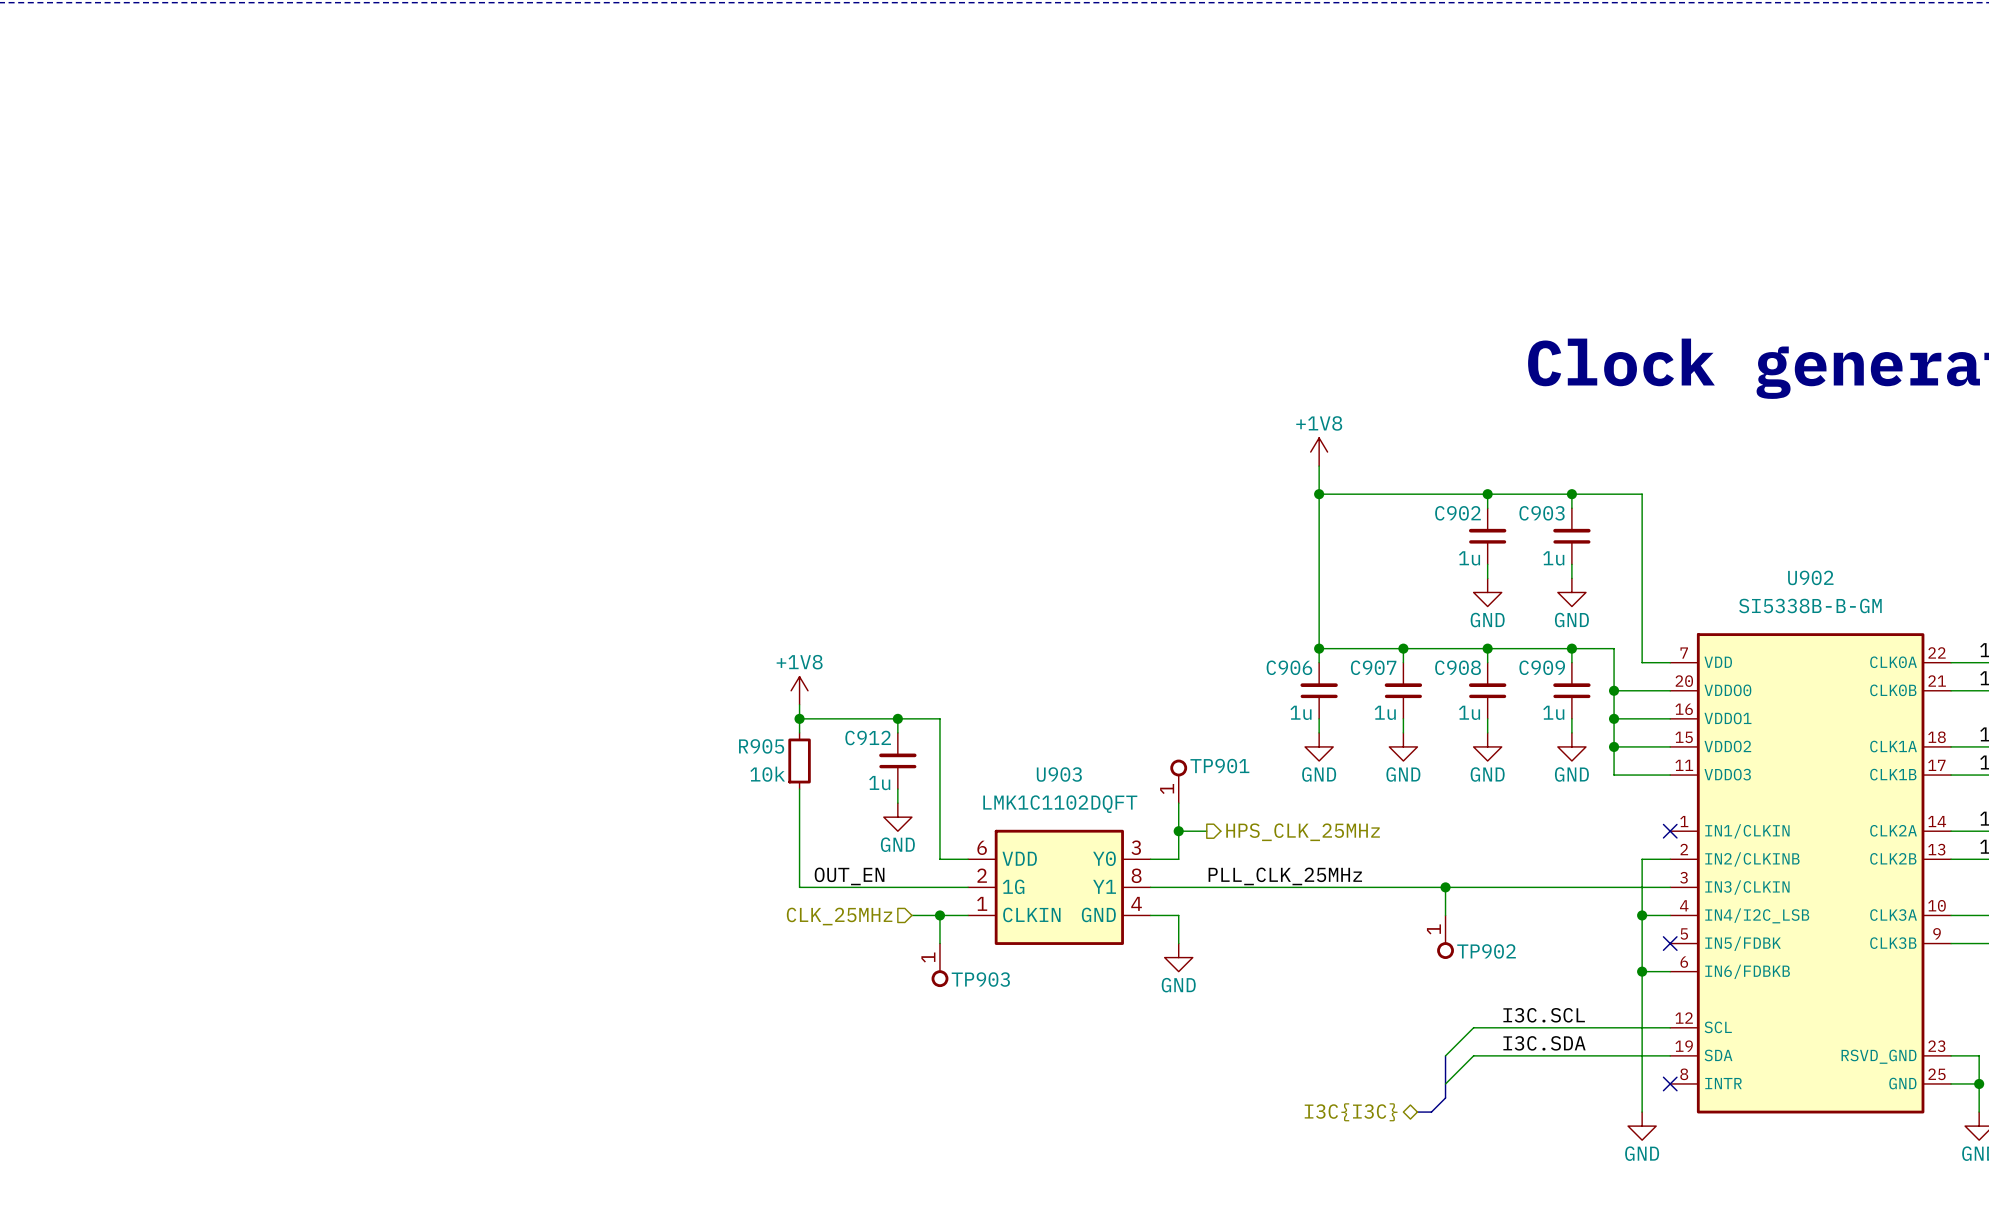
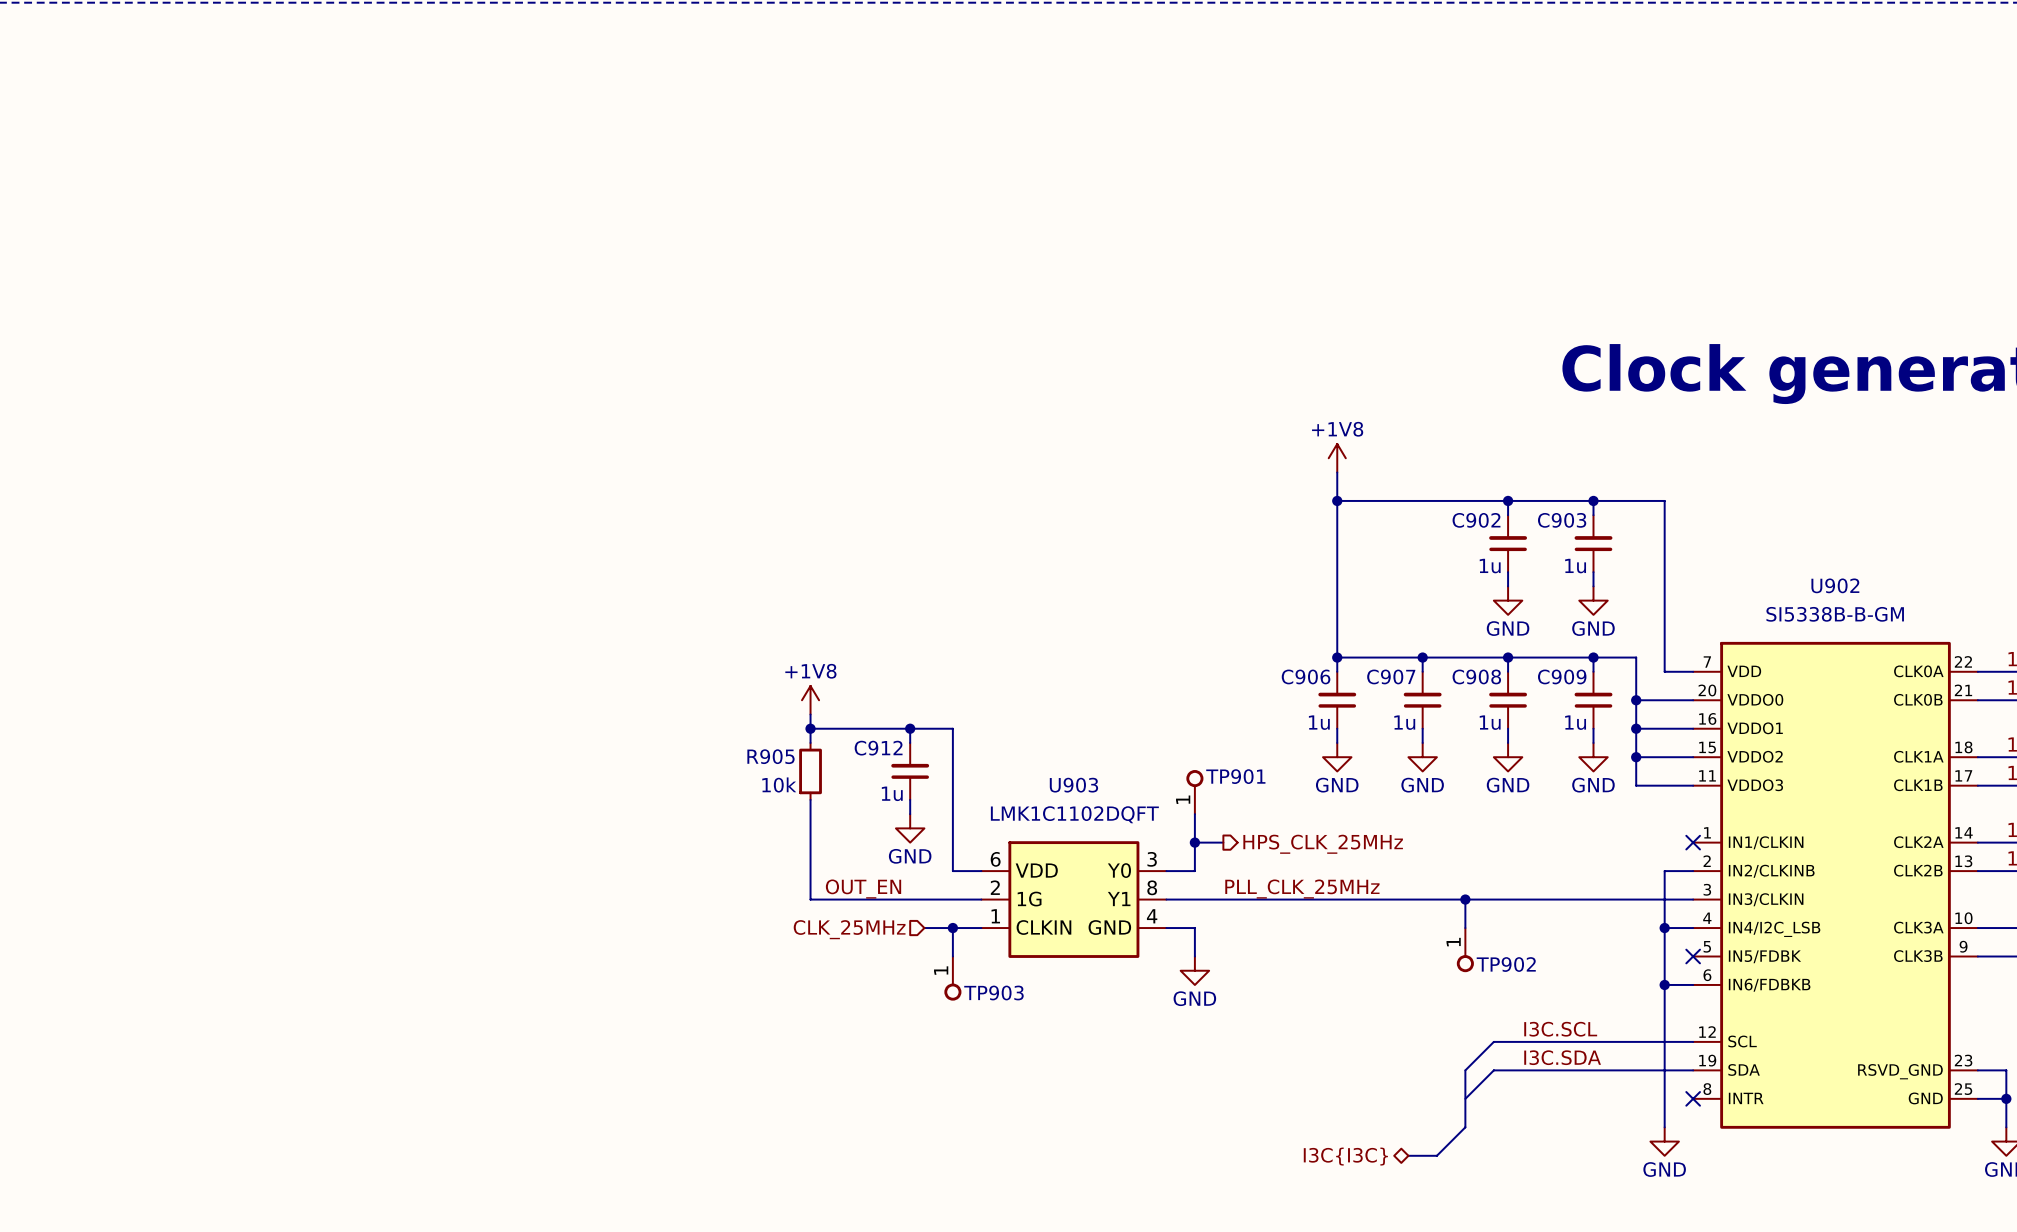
bus: (1445, 1098) (1431, 1112) (1417, 1112) -> (1465, 1113) (1465, 1127) (1436, 1155) (1408, 1155)
hierarchical label position: I3C{I3C} (1351, 1112) -> I3C{I3C} (1345, 1156)

